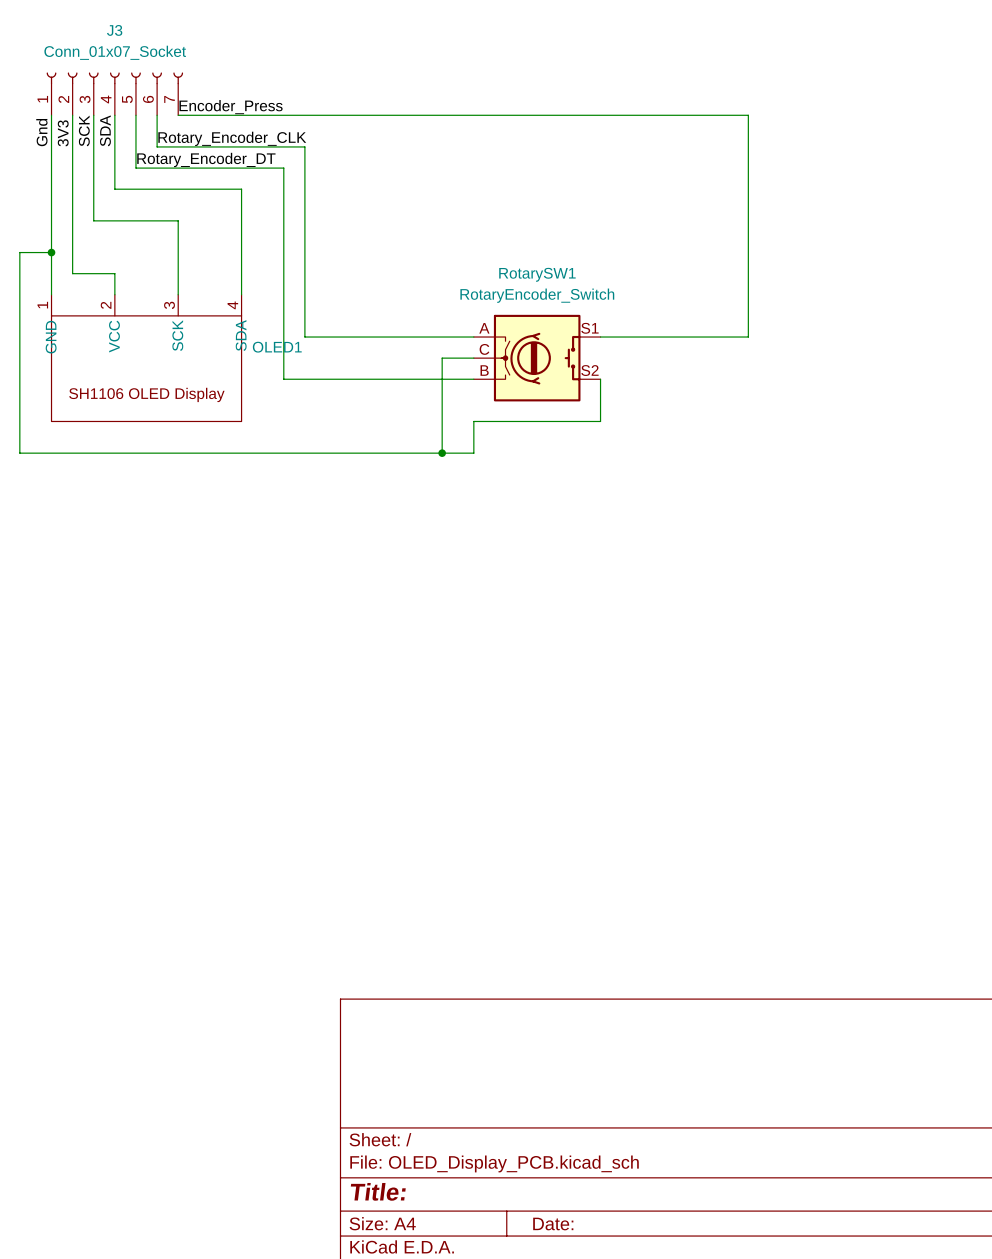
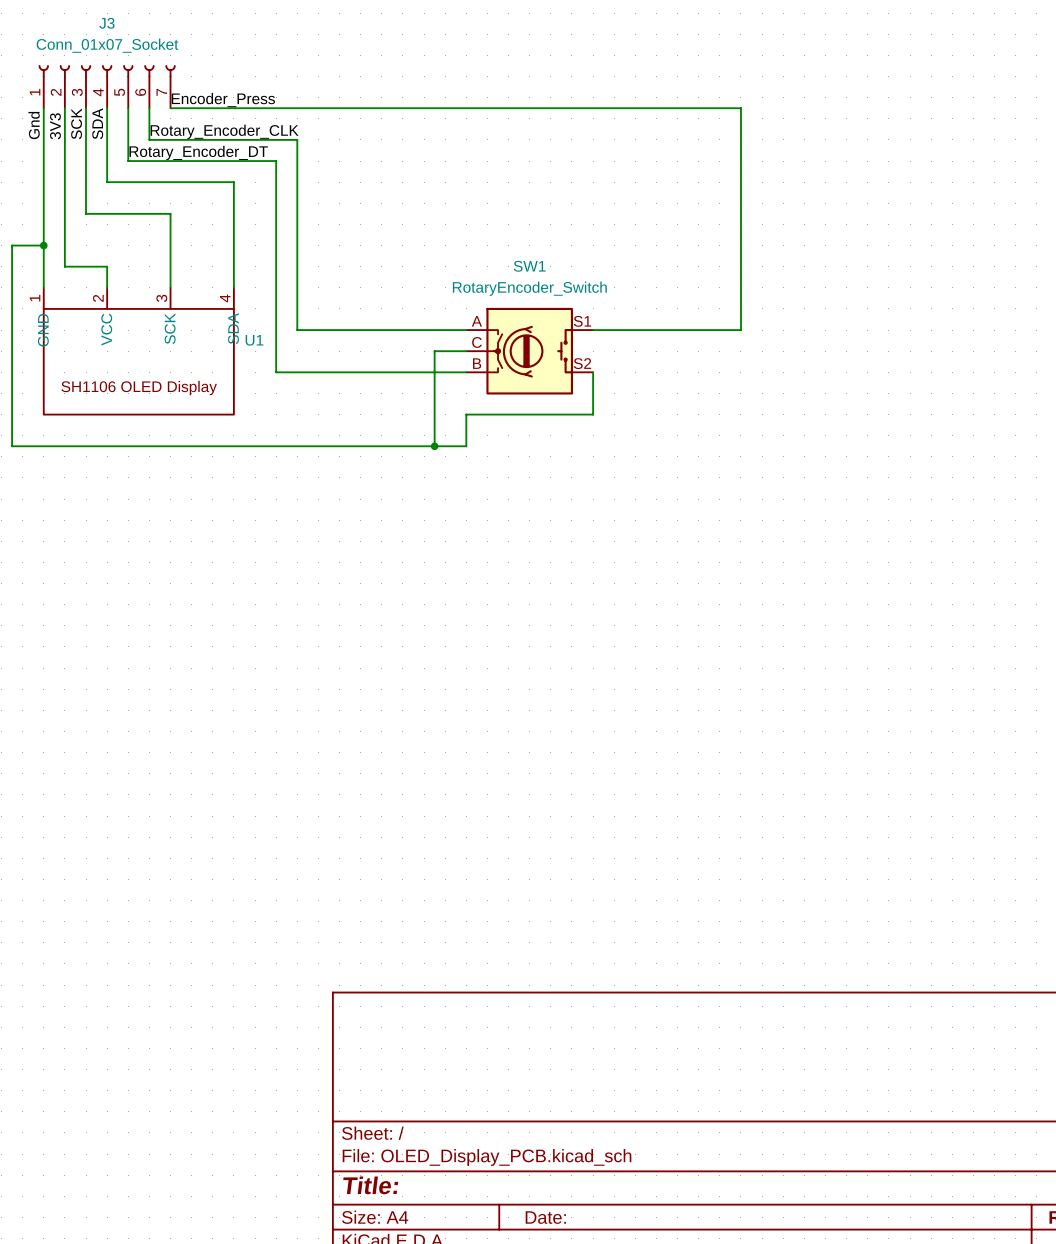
RotarySW1 name: RotarySW1 (537, 274) -> SW1 (529, 266)
OLED1 name: OLED1 (277, 347) -> U1 (254, 340)

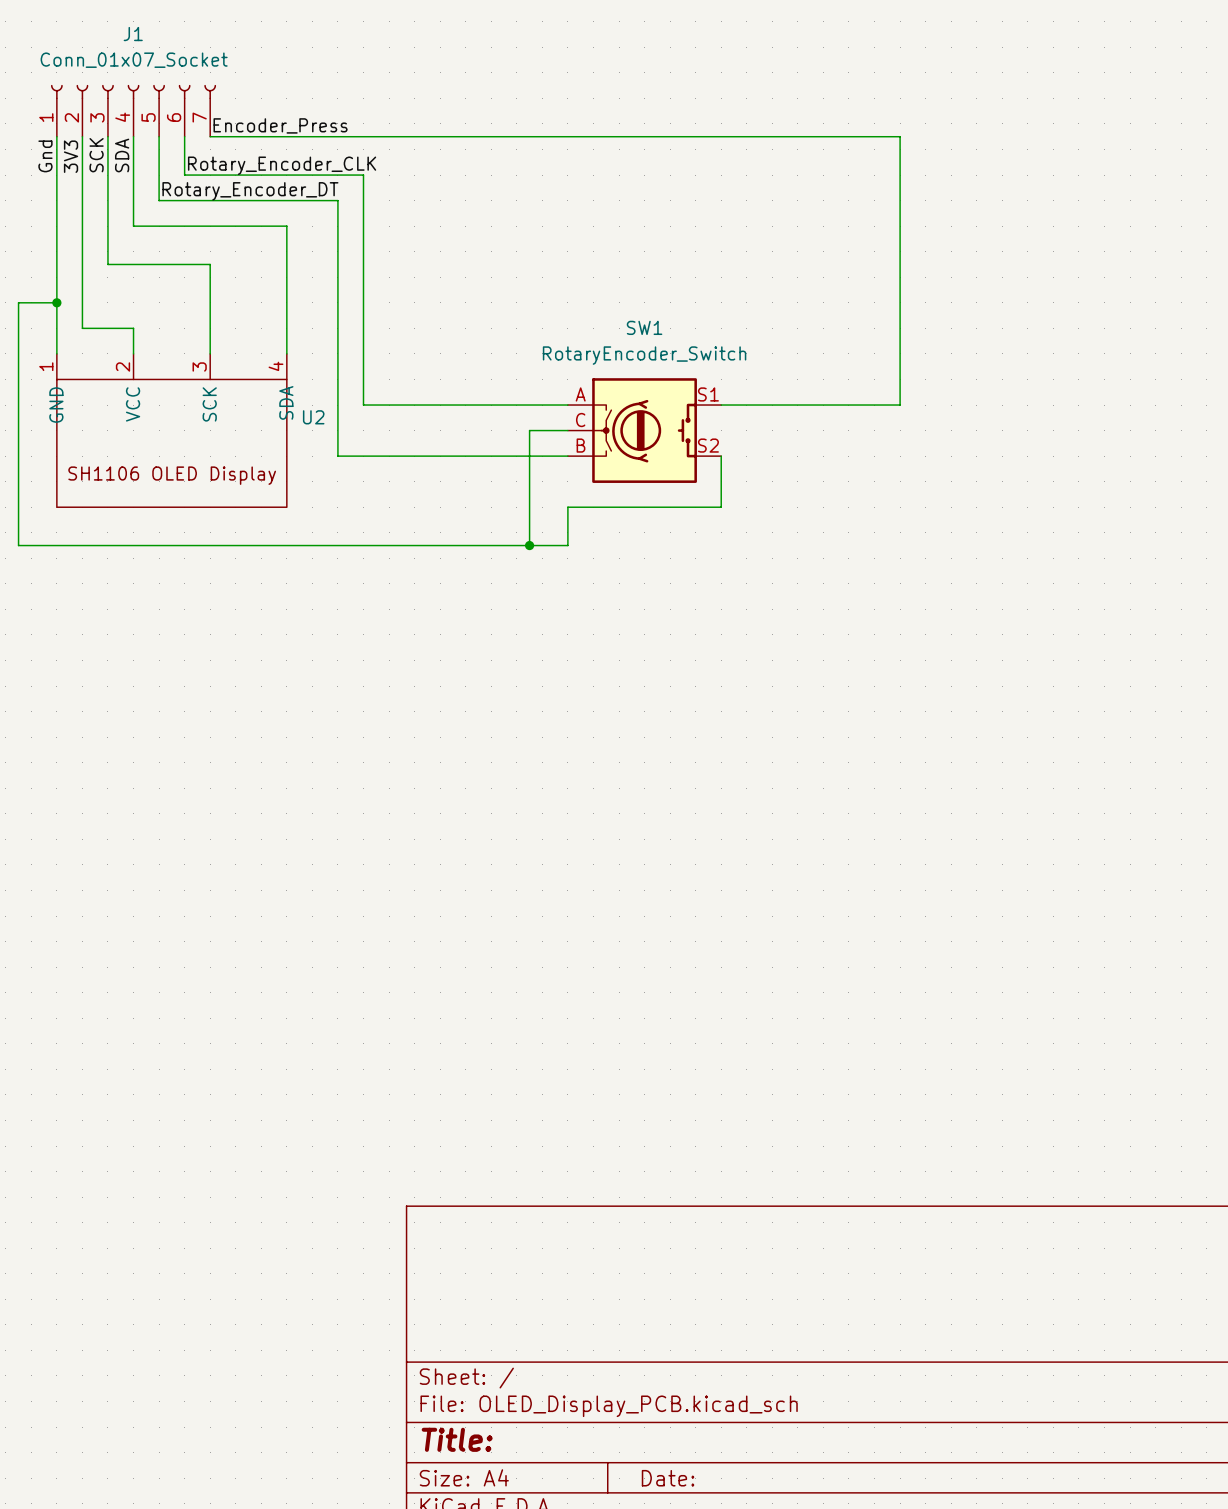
J3 name: J3 (106, 23) -> J1 (133, 34)
U1 name: U1 (254, 340) -> U2 (313, 417)

